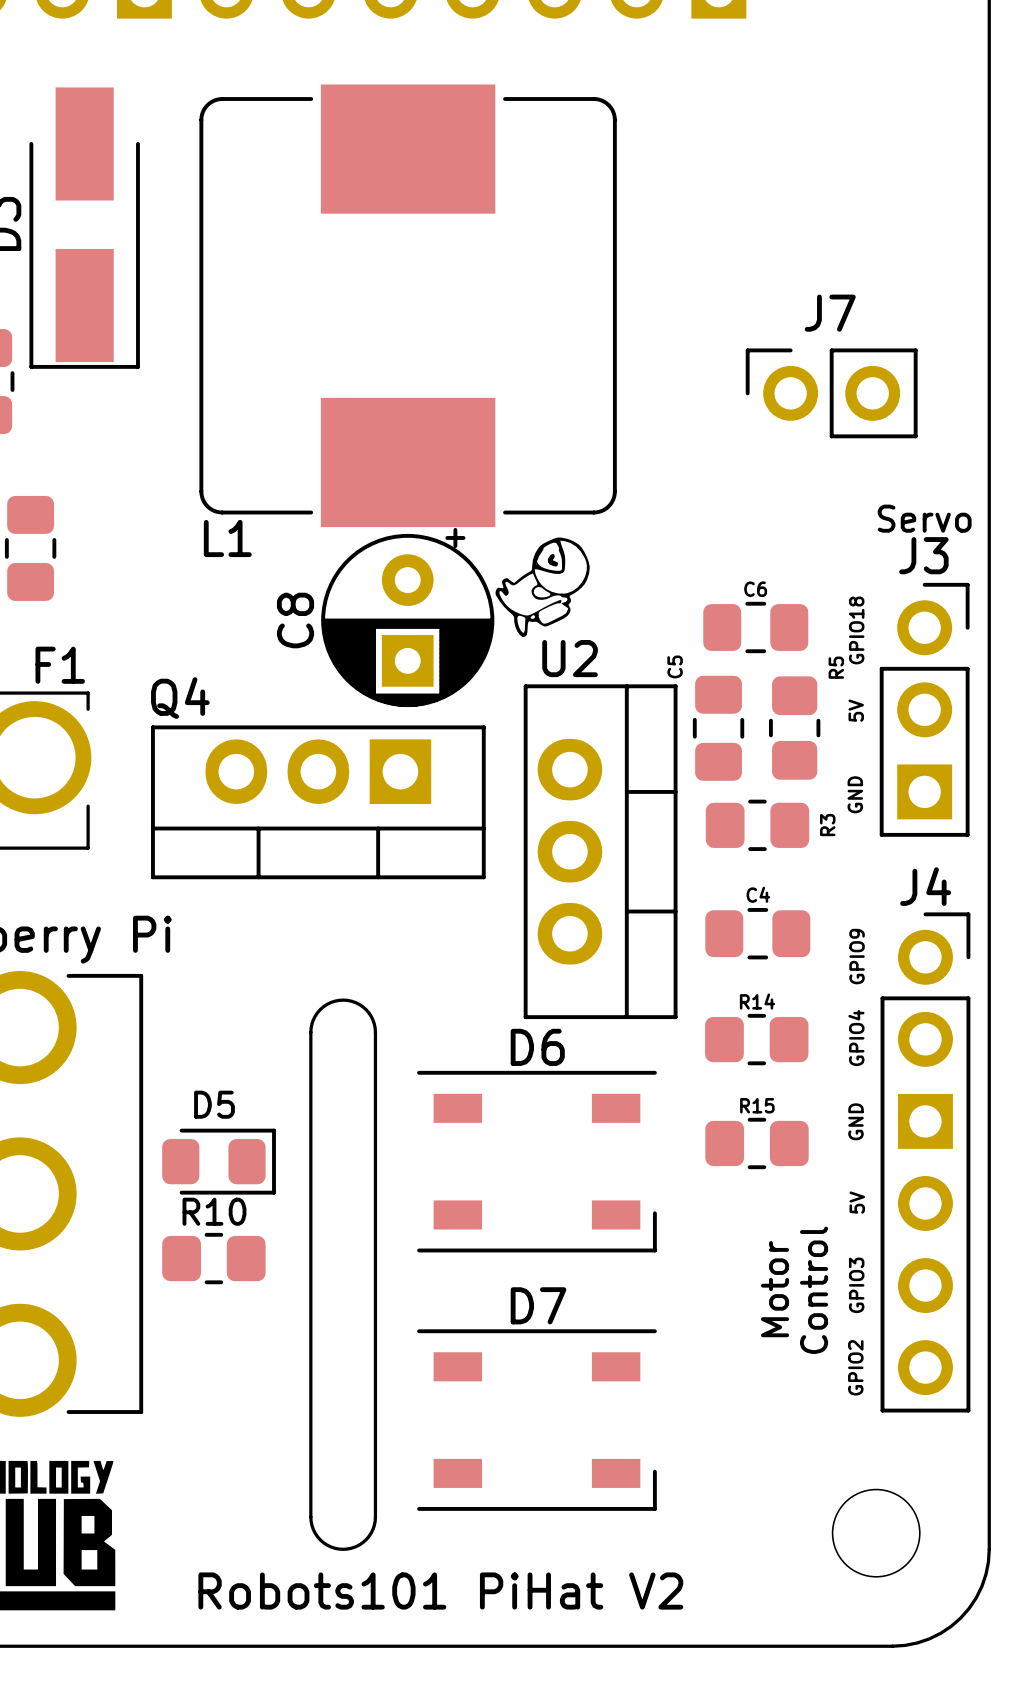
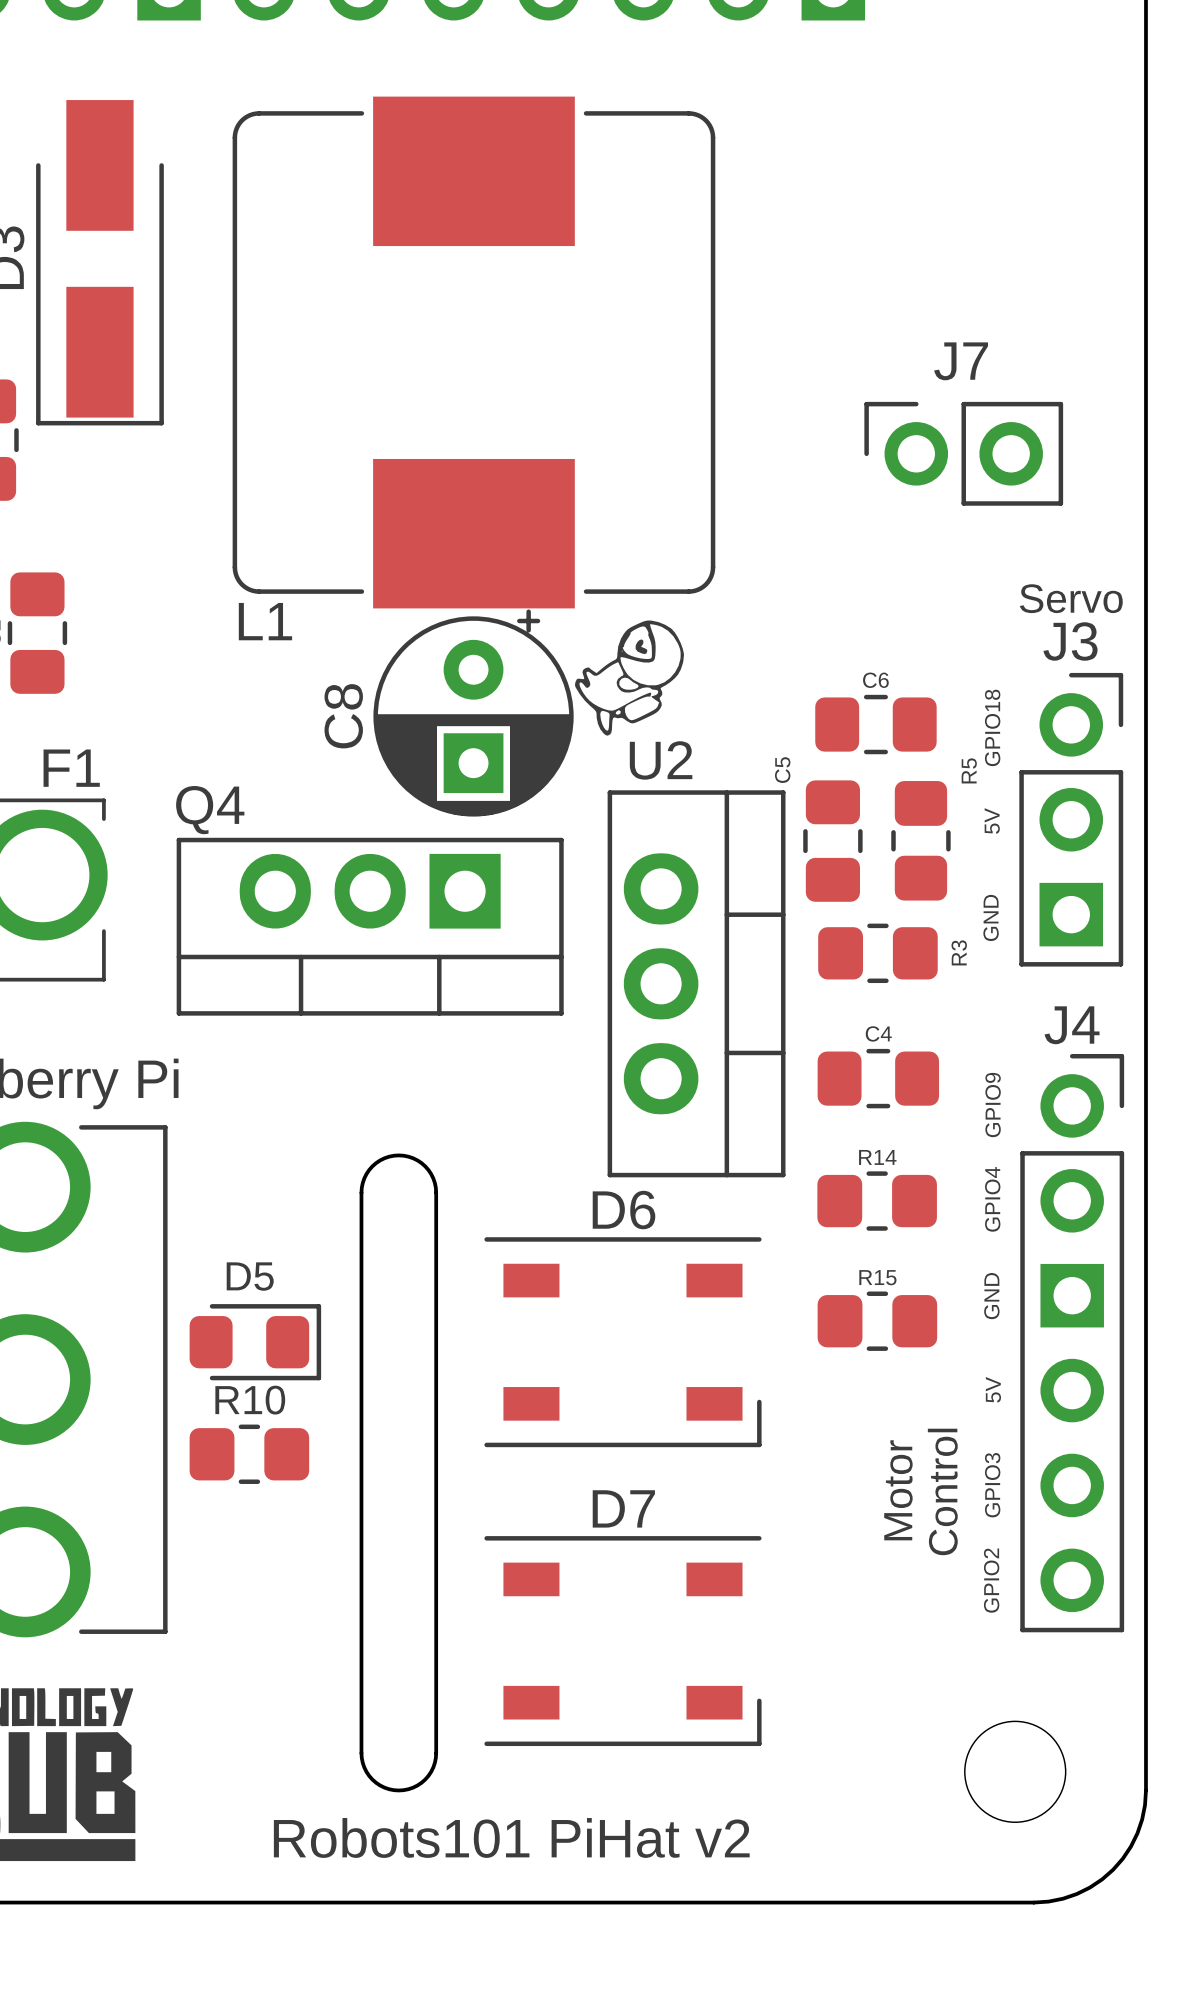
text: Robots101 PiHat V2 (440, 1591) -> Robots101 PiHat v2 (511, 1837)

